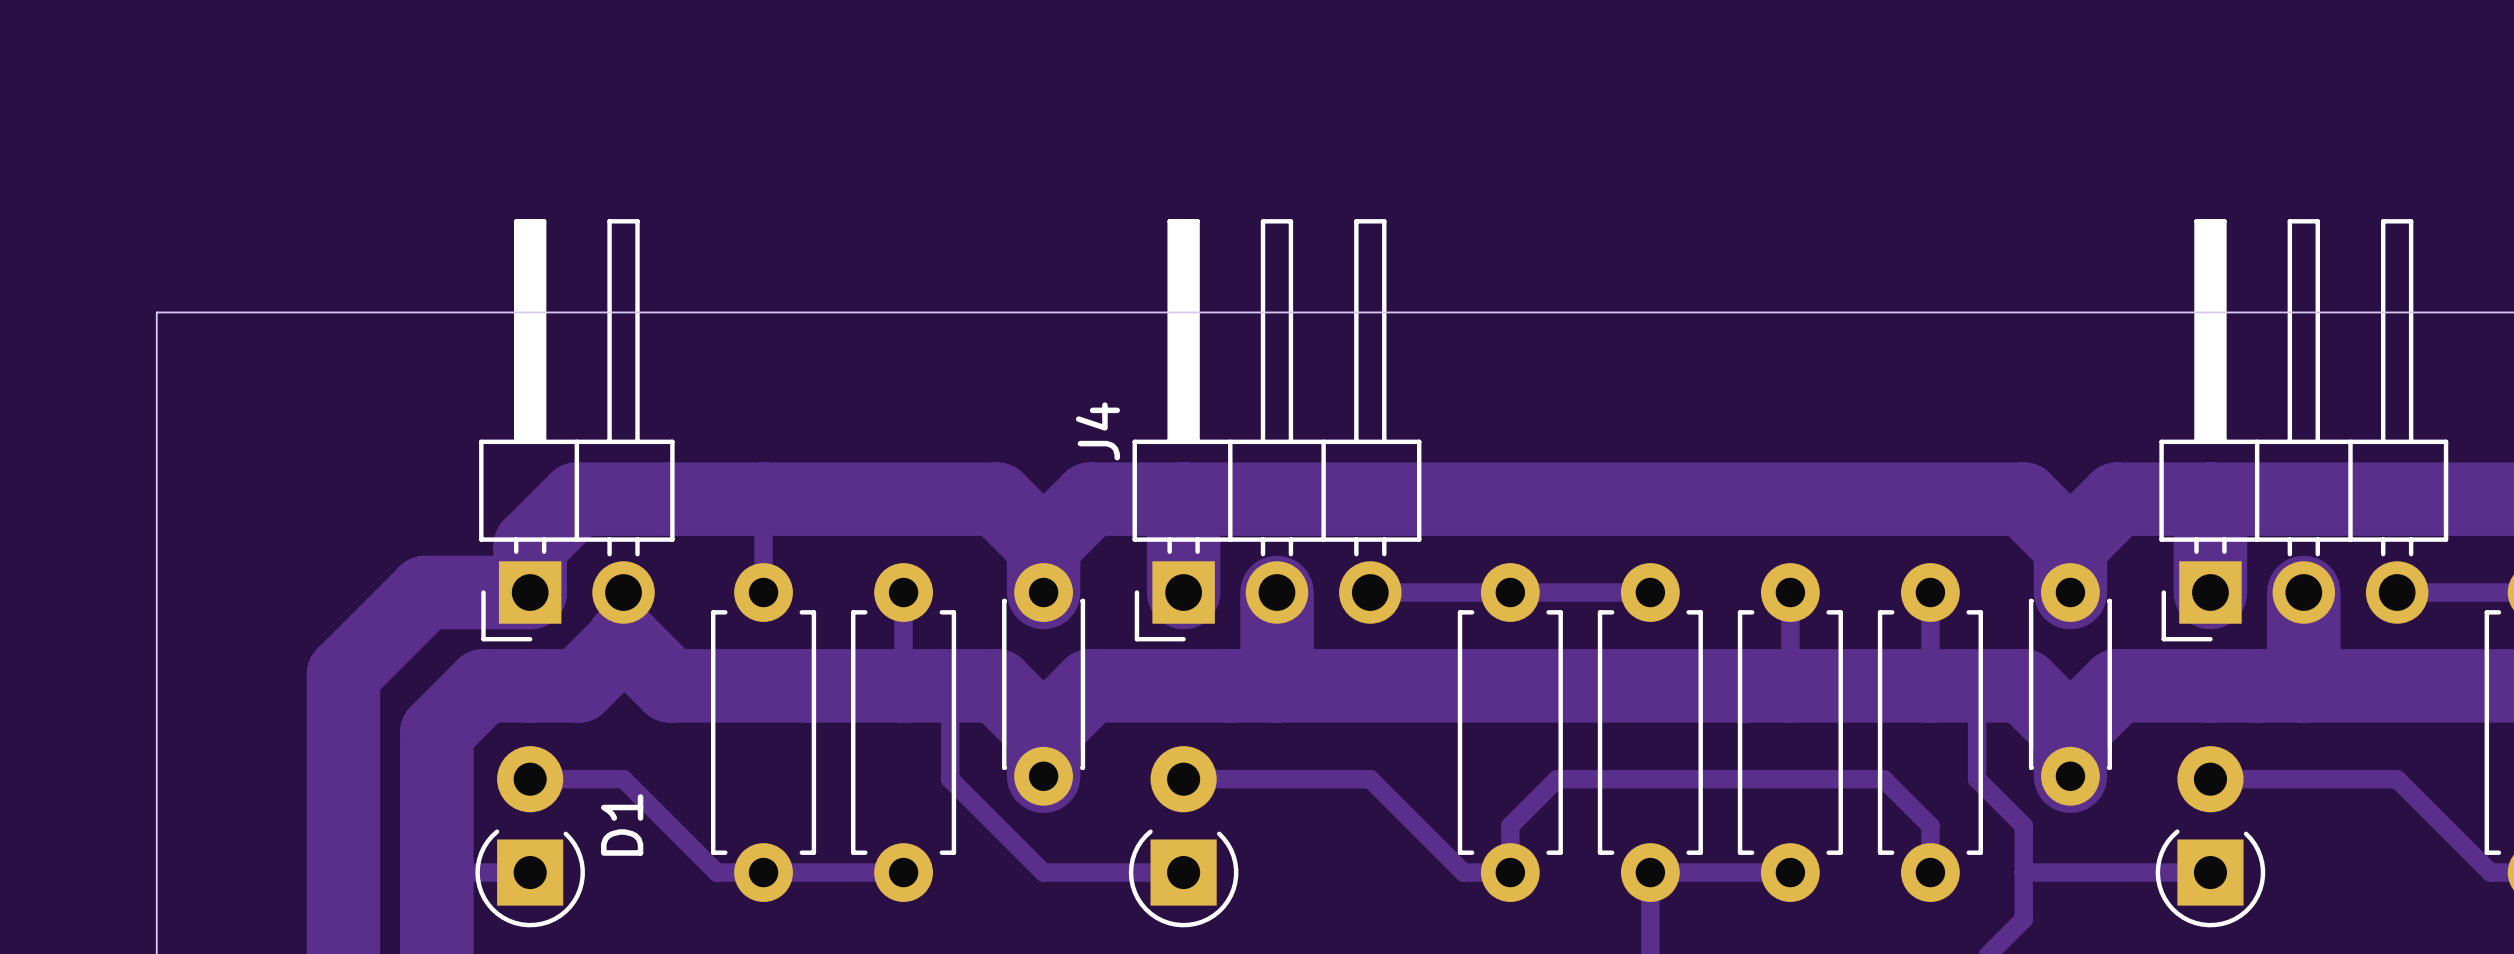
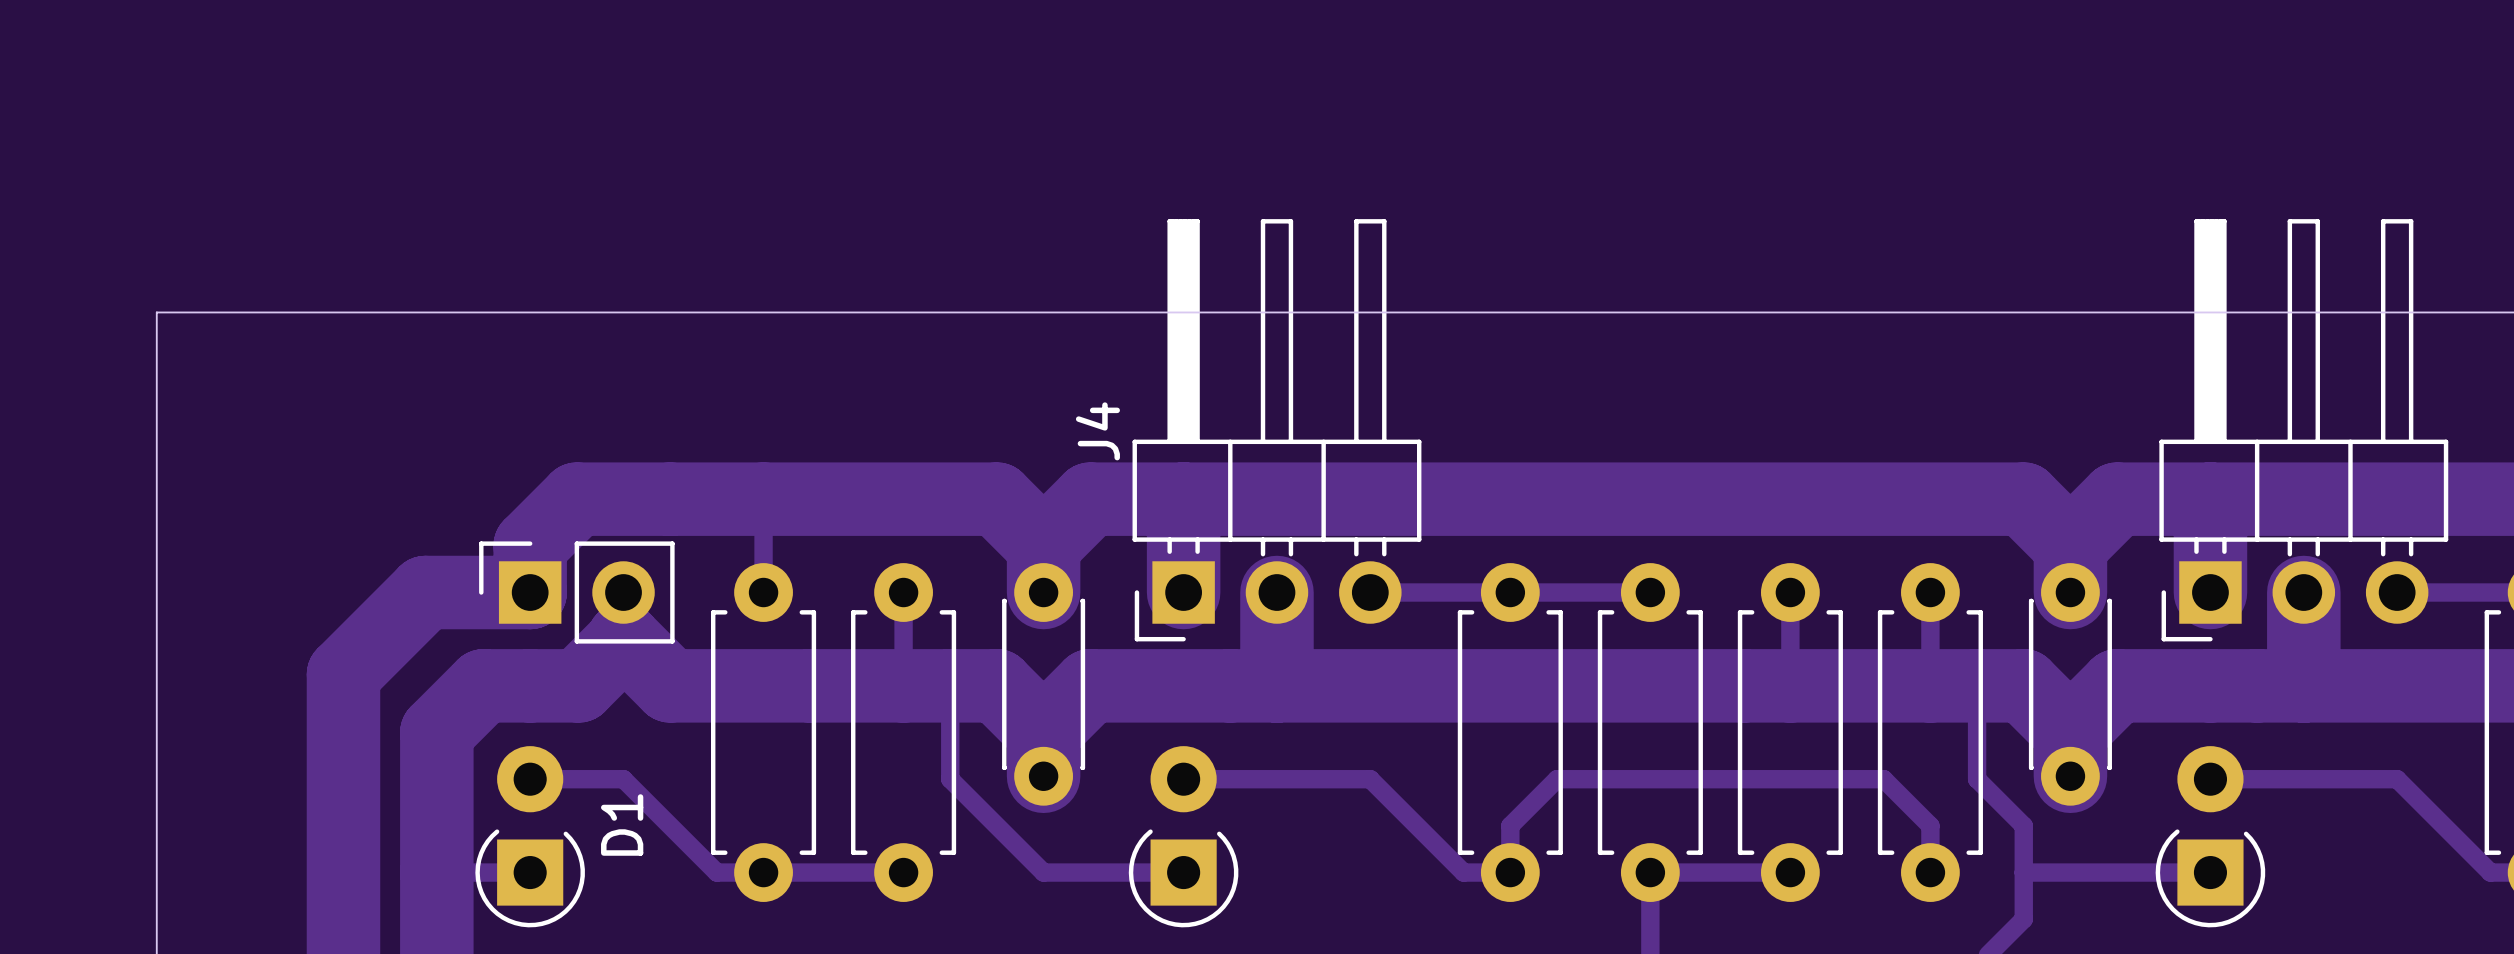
part: (576, 430) -> none
part: none -> (576, 592)

